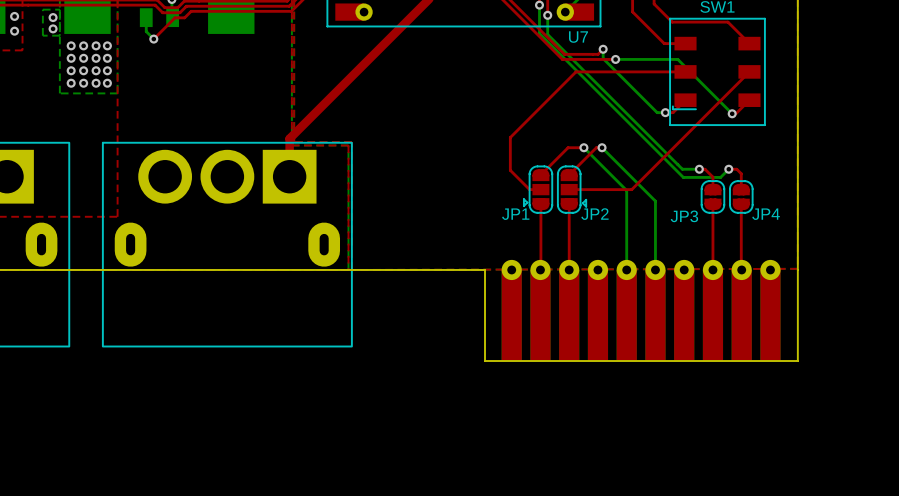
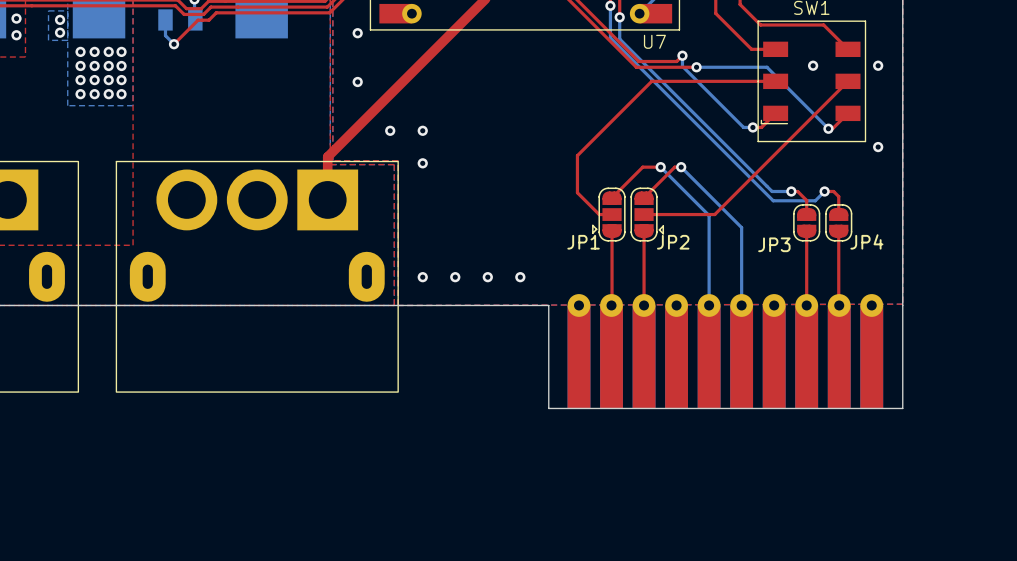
via: none -> (357, 33)
via: none -> (813, 65)
via: none -> (878, 65)
via: none -> (357, 81)
via: none -> (390, 130)
via: none -> (422, 130)
via: none -> (878, 147)
via: none -> (422, 163)
via: none -> (422, 277)
via: none -> (455, 277)
via: none -> (487, 277)
via: none -> (520, 277)

